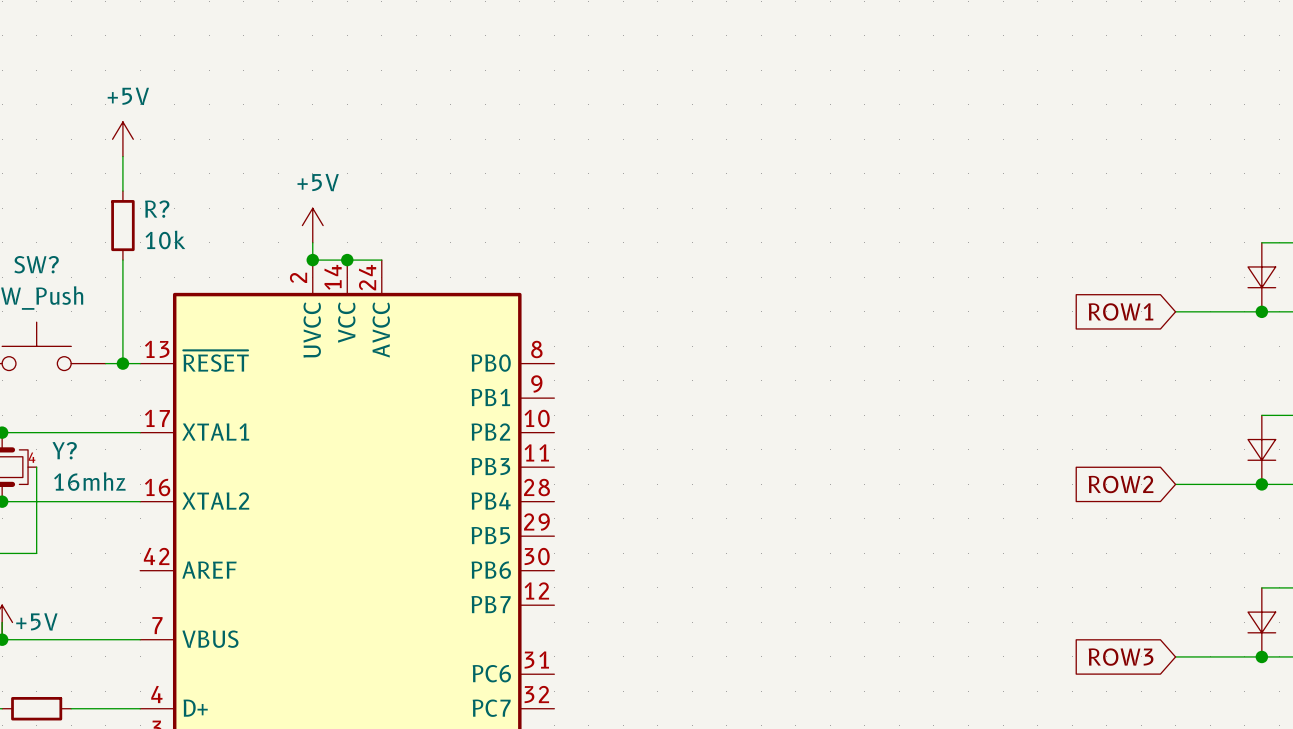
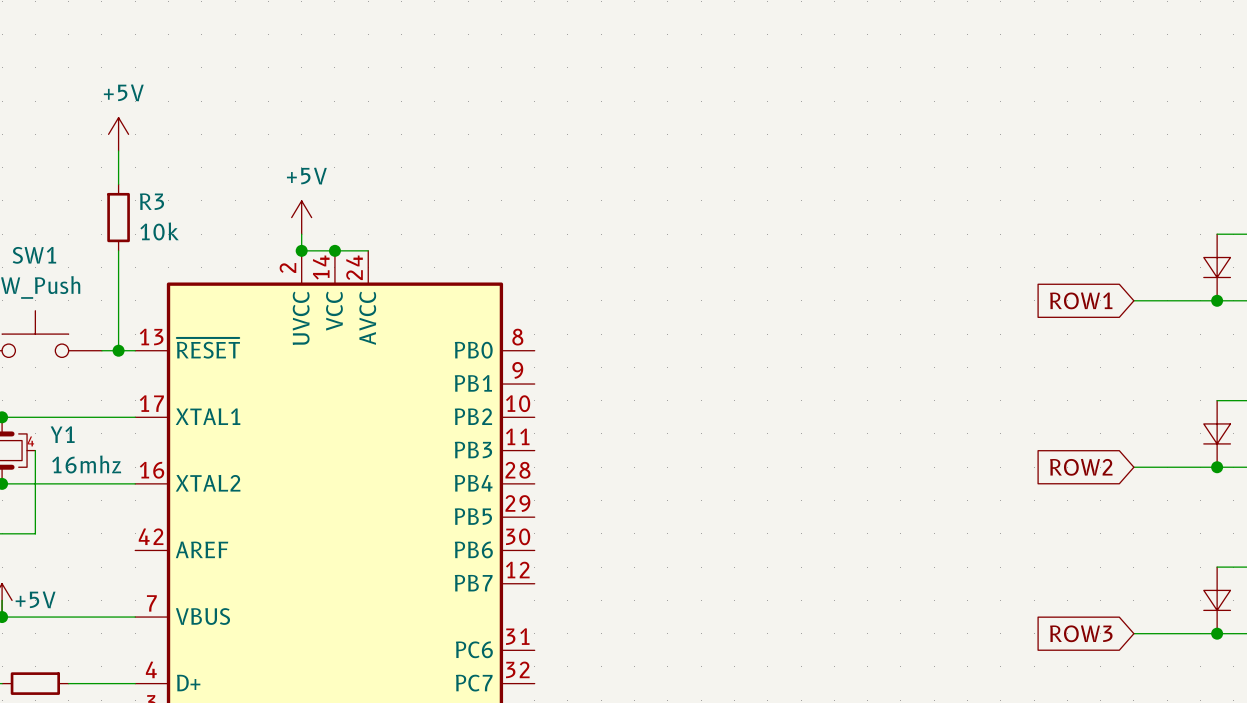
R? name: R? (157, 209) -> R3 (151, 201)
SW? name: SW? (36, 264) -> SW1 (34, 255)
Y? name: Y? (64, 450) -> Y1 (62, 434)

